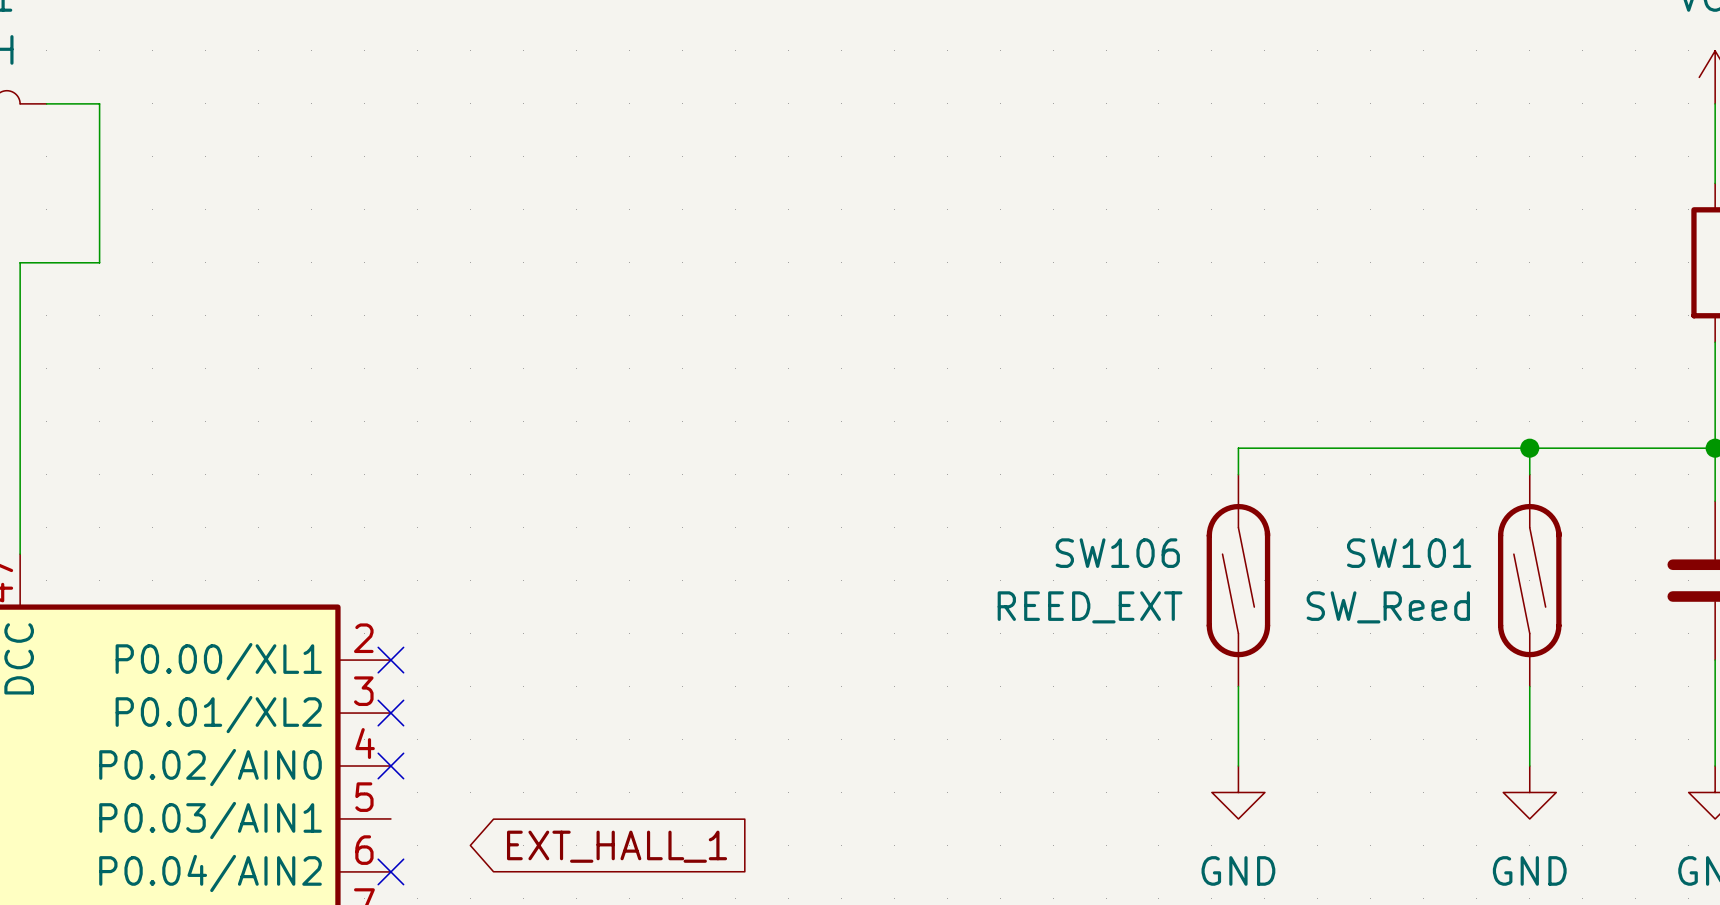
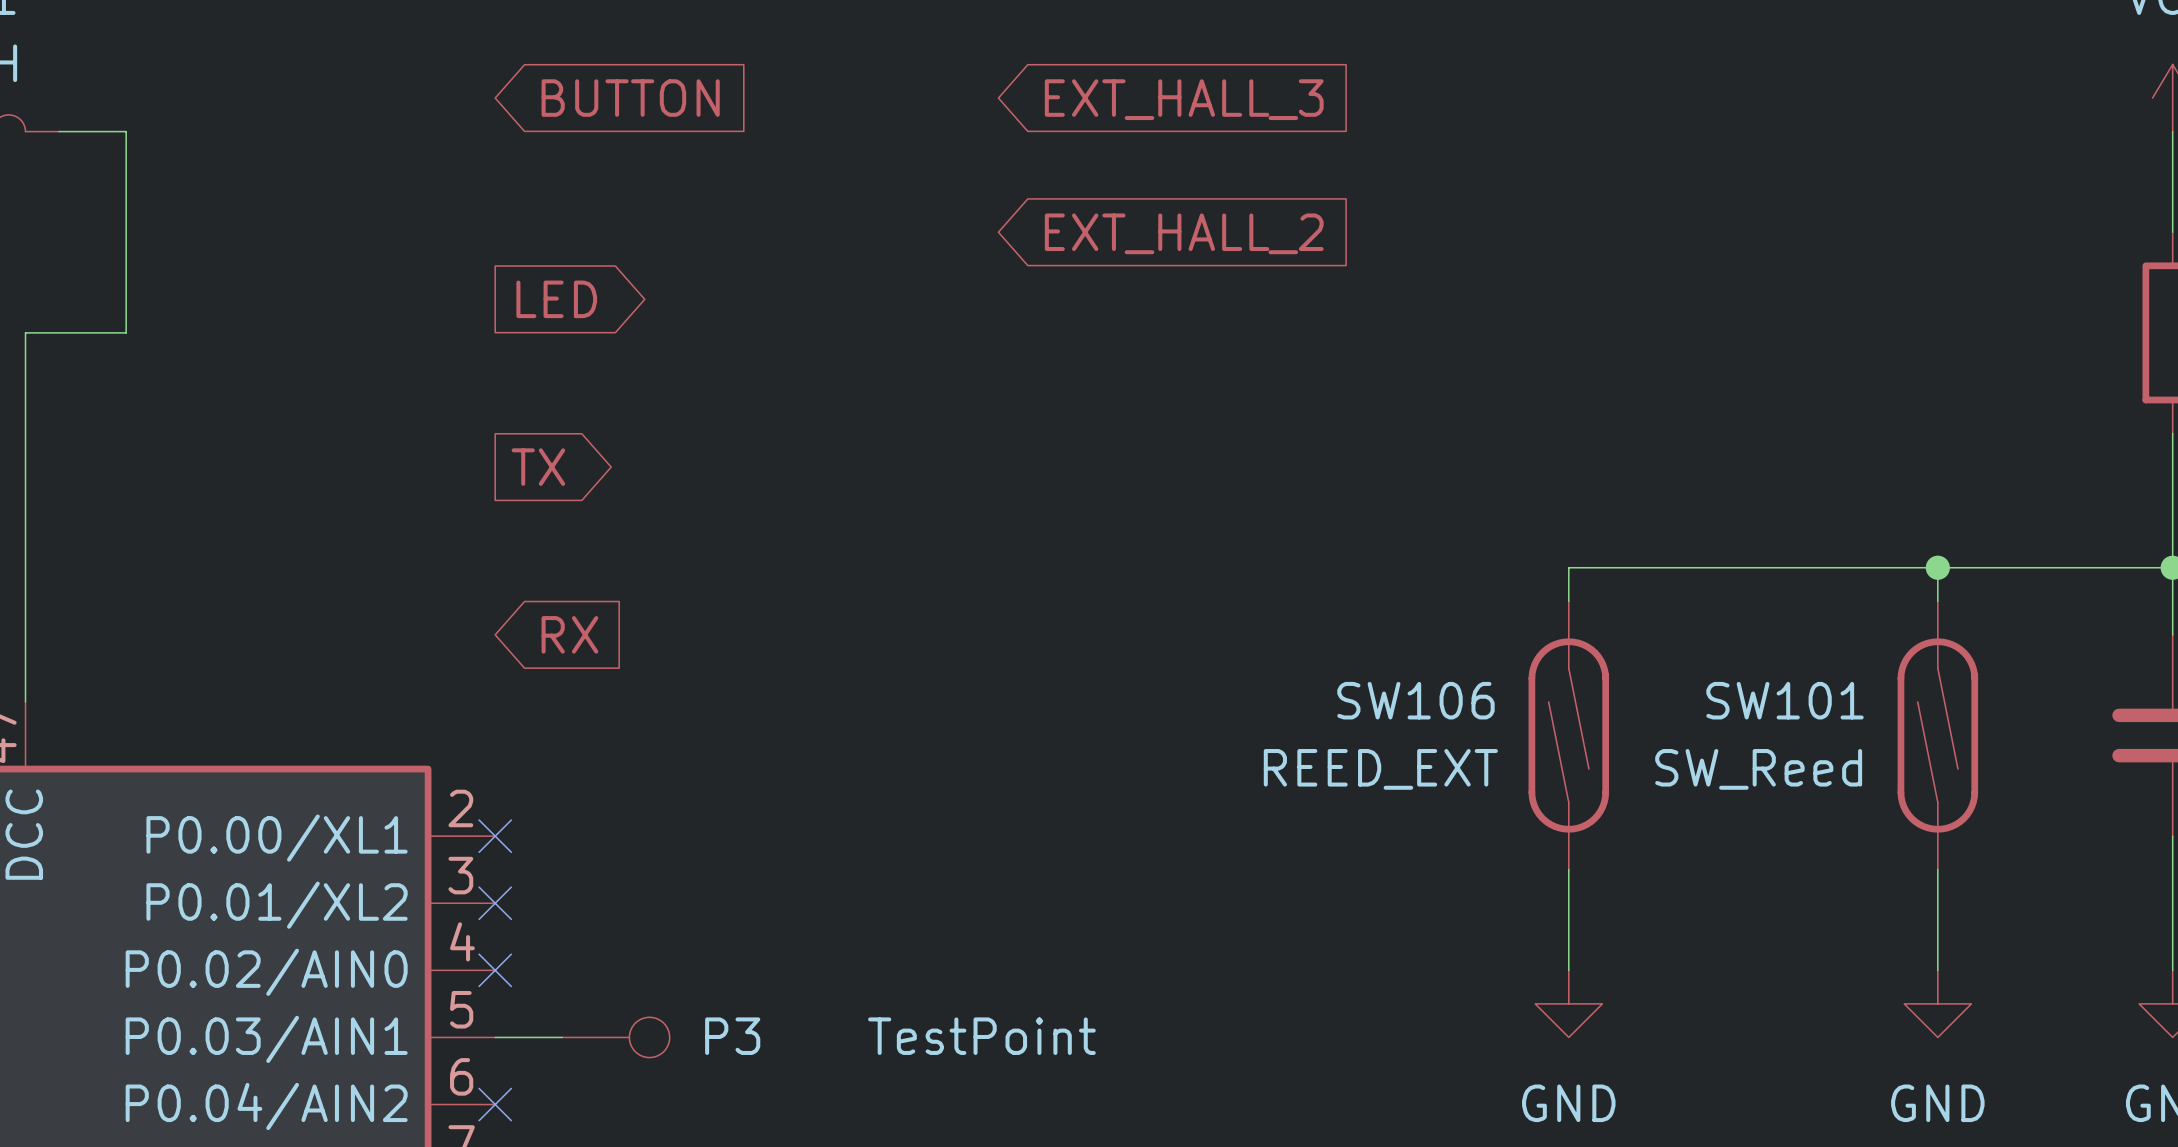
global label: none -> BUTTON (630, 98)
global label: none -> EXT_HALL_3 (1184, 99)
global label: none -> EXT_HALL_2 (1184, 233)
global label: none -> LED (556, 299)
global label: none -> TX (538, 467)
global label: none -> RX (569, 634)
wire: none -> (495, 1037) (562, 1037)
P3: none -> TestPoint (615, 1037)
global label: EXT_HALL_1 (617, 846) -> none

